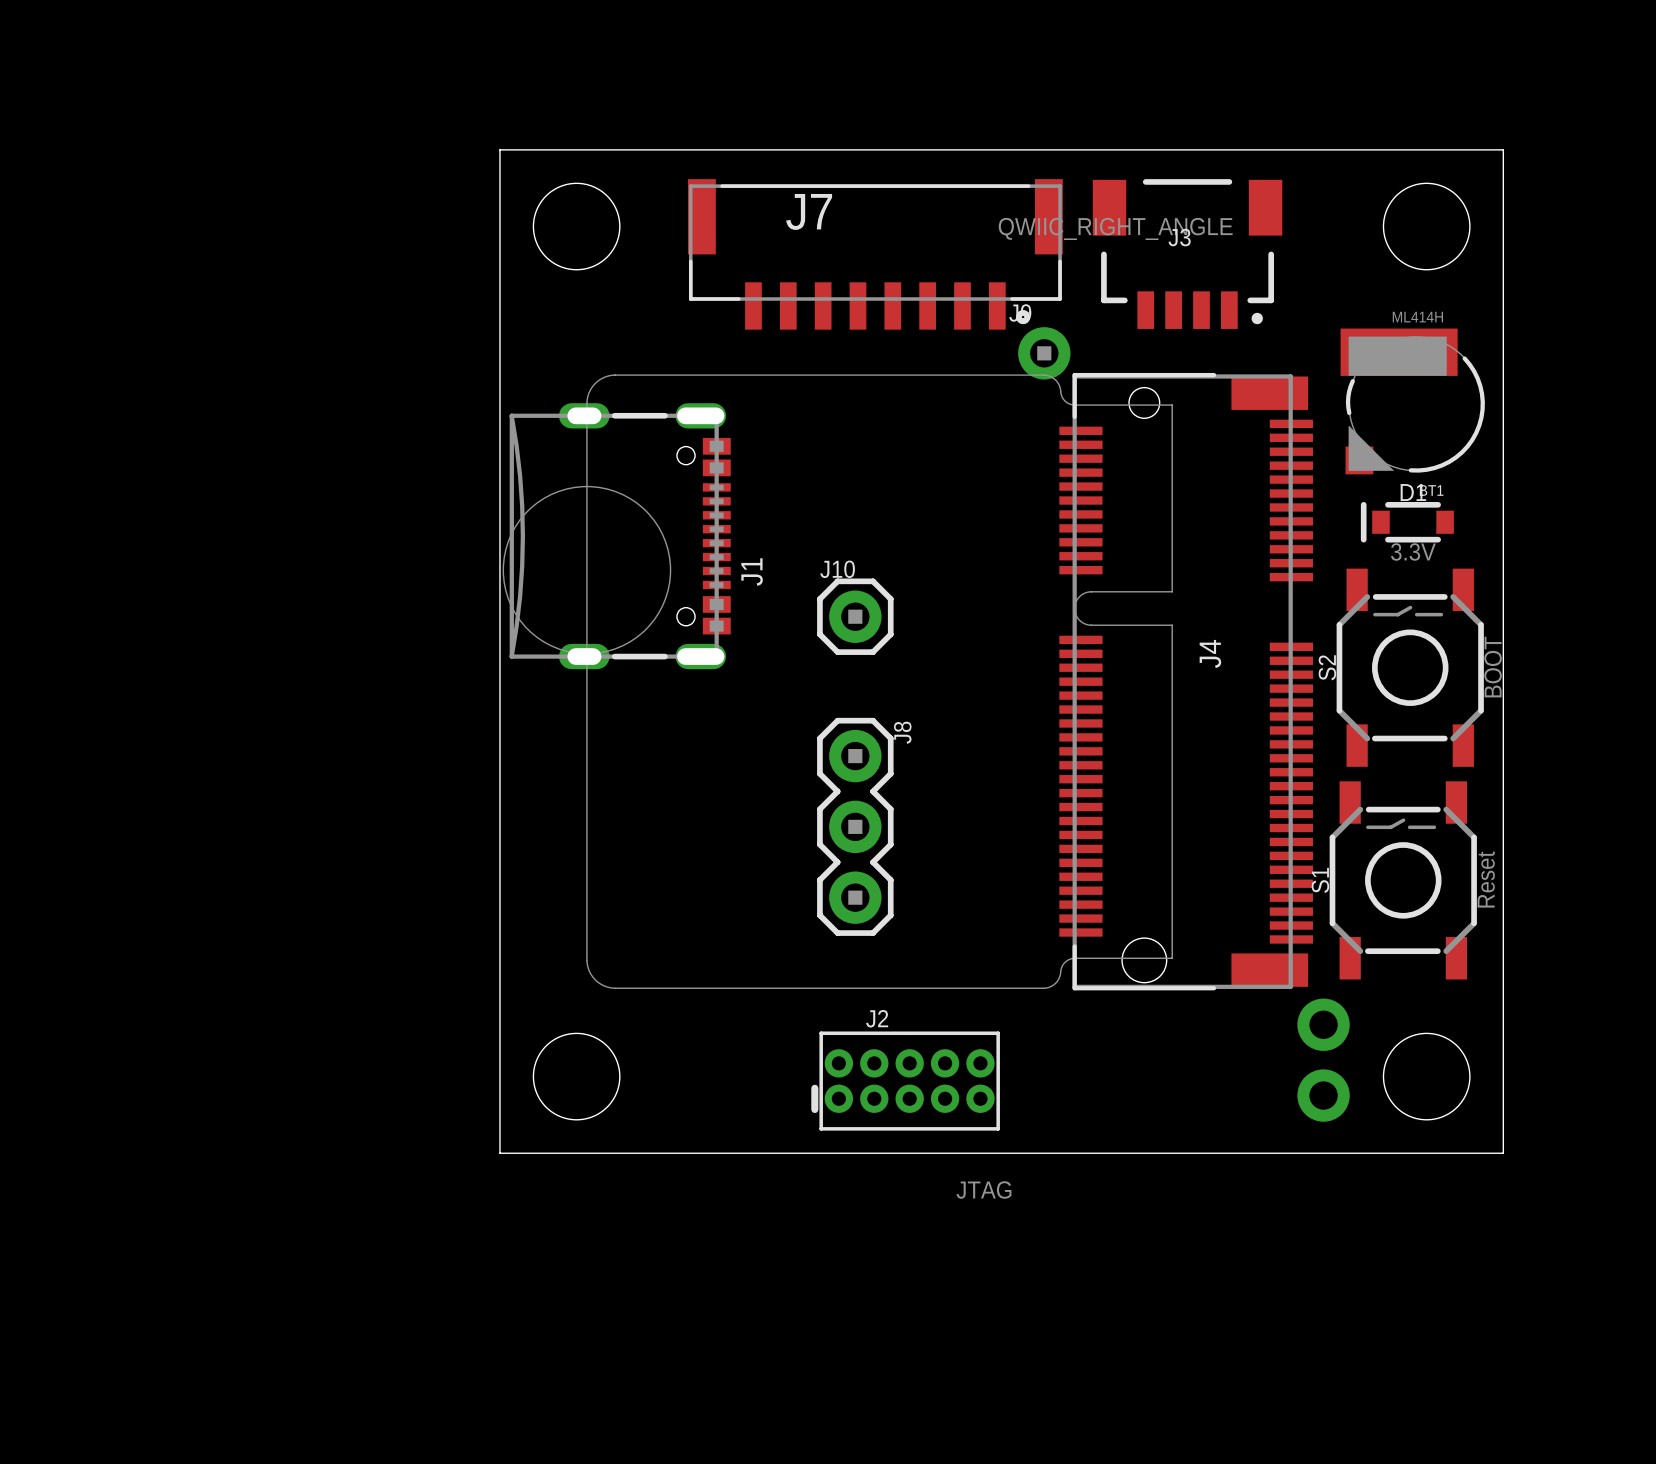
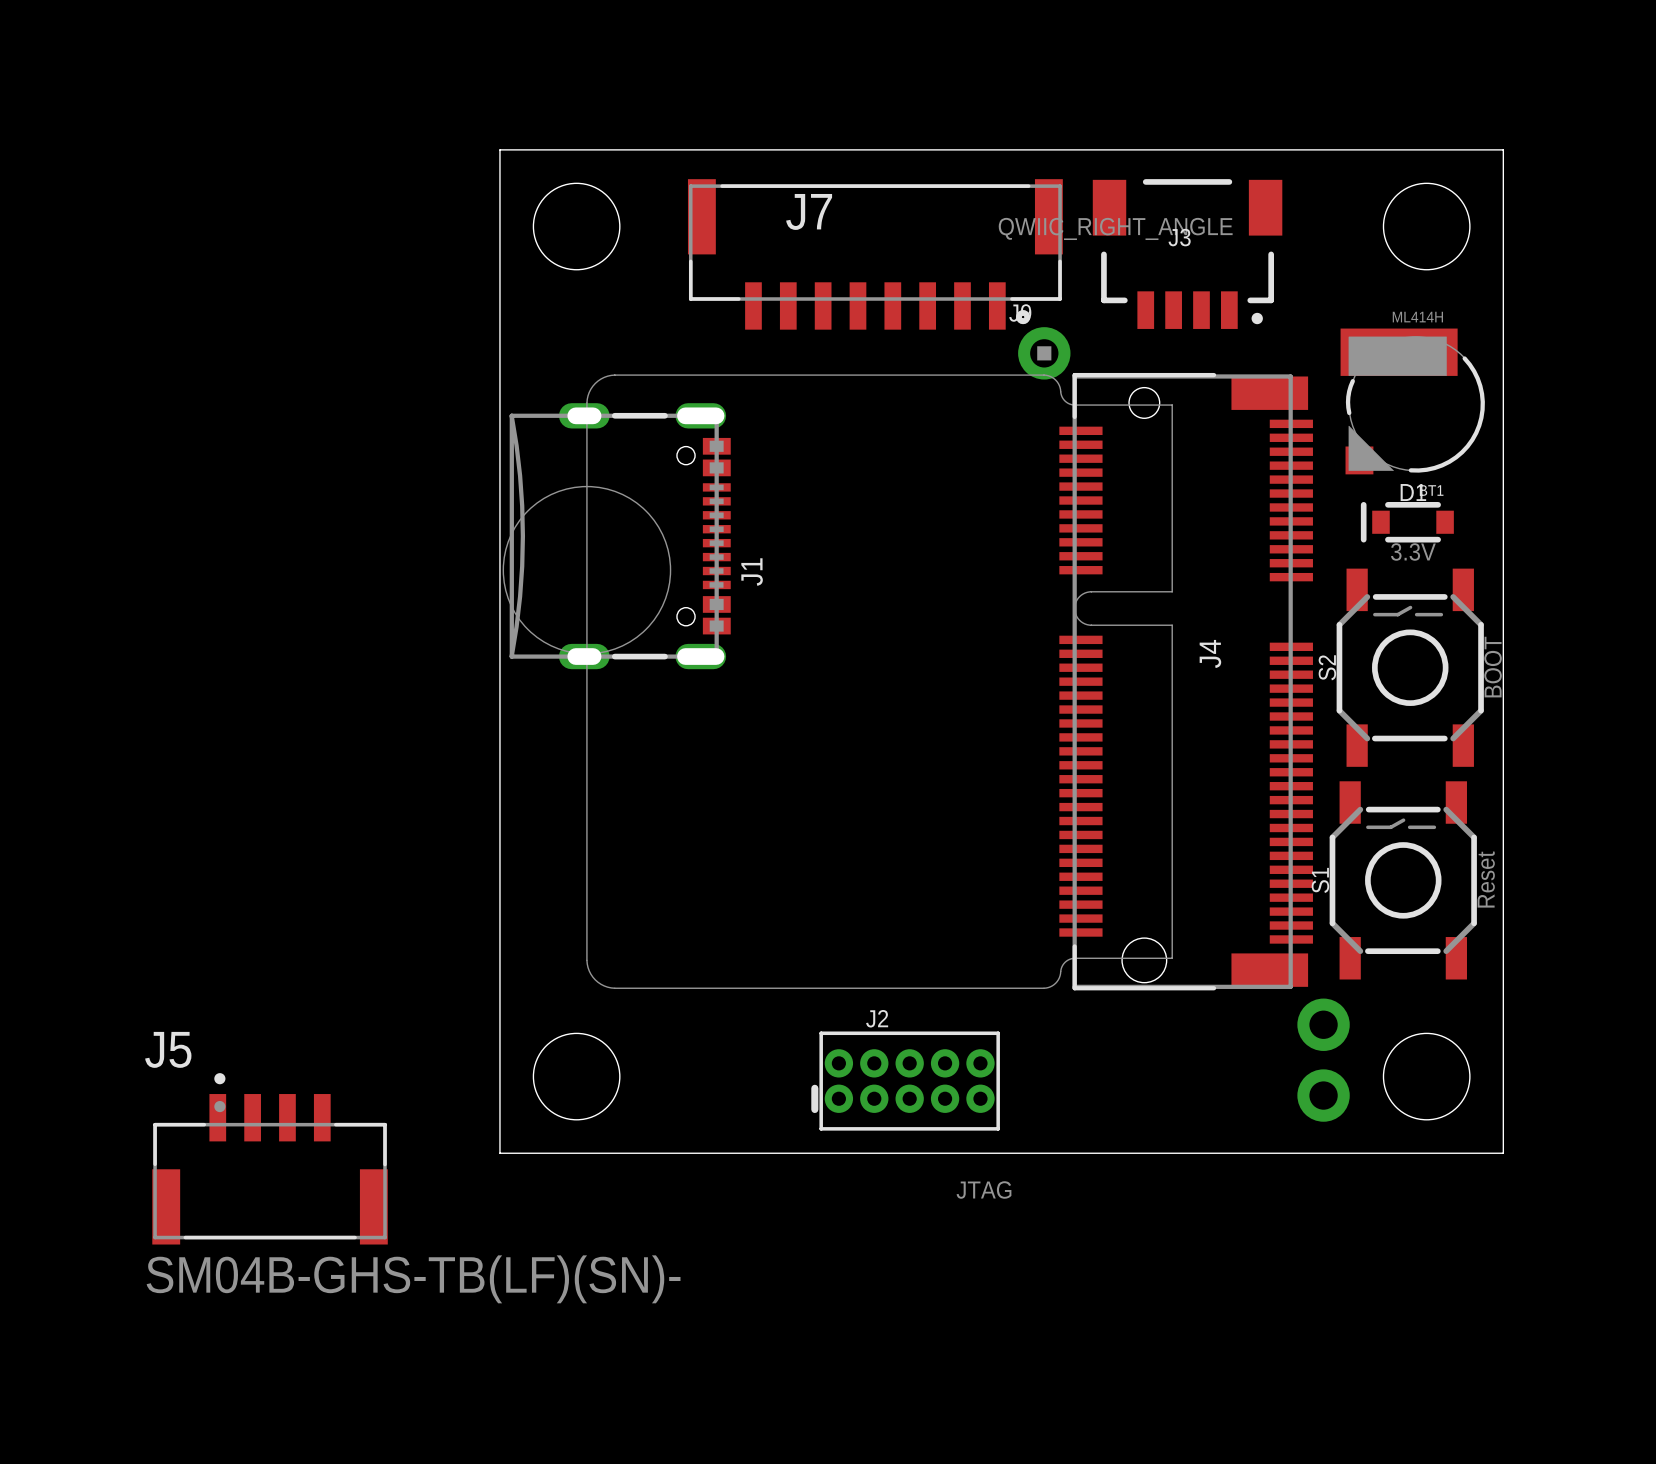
J10: (855, 616) -> none
J8: (855, 826) -> none
J5: none -> SM04B-GHS-TB(LF)(SN)- (270, 1158)

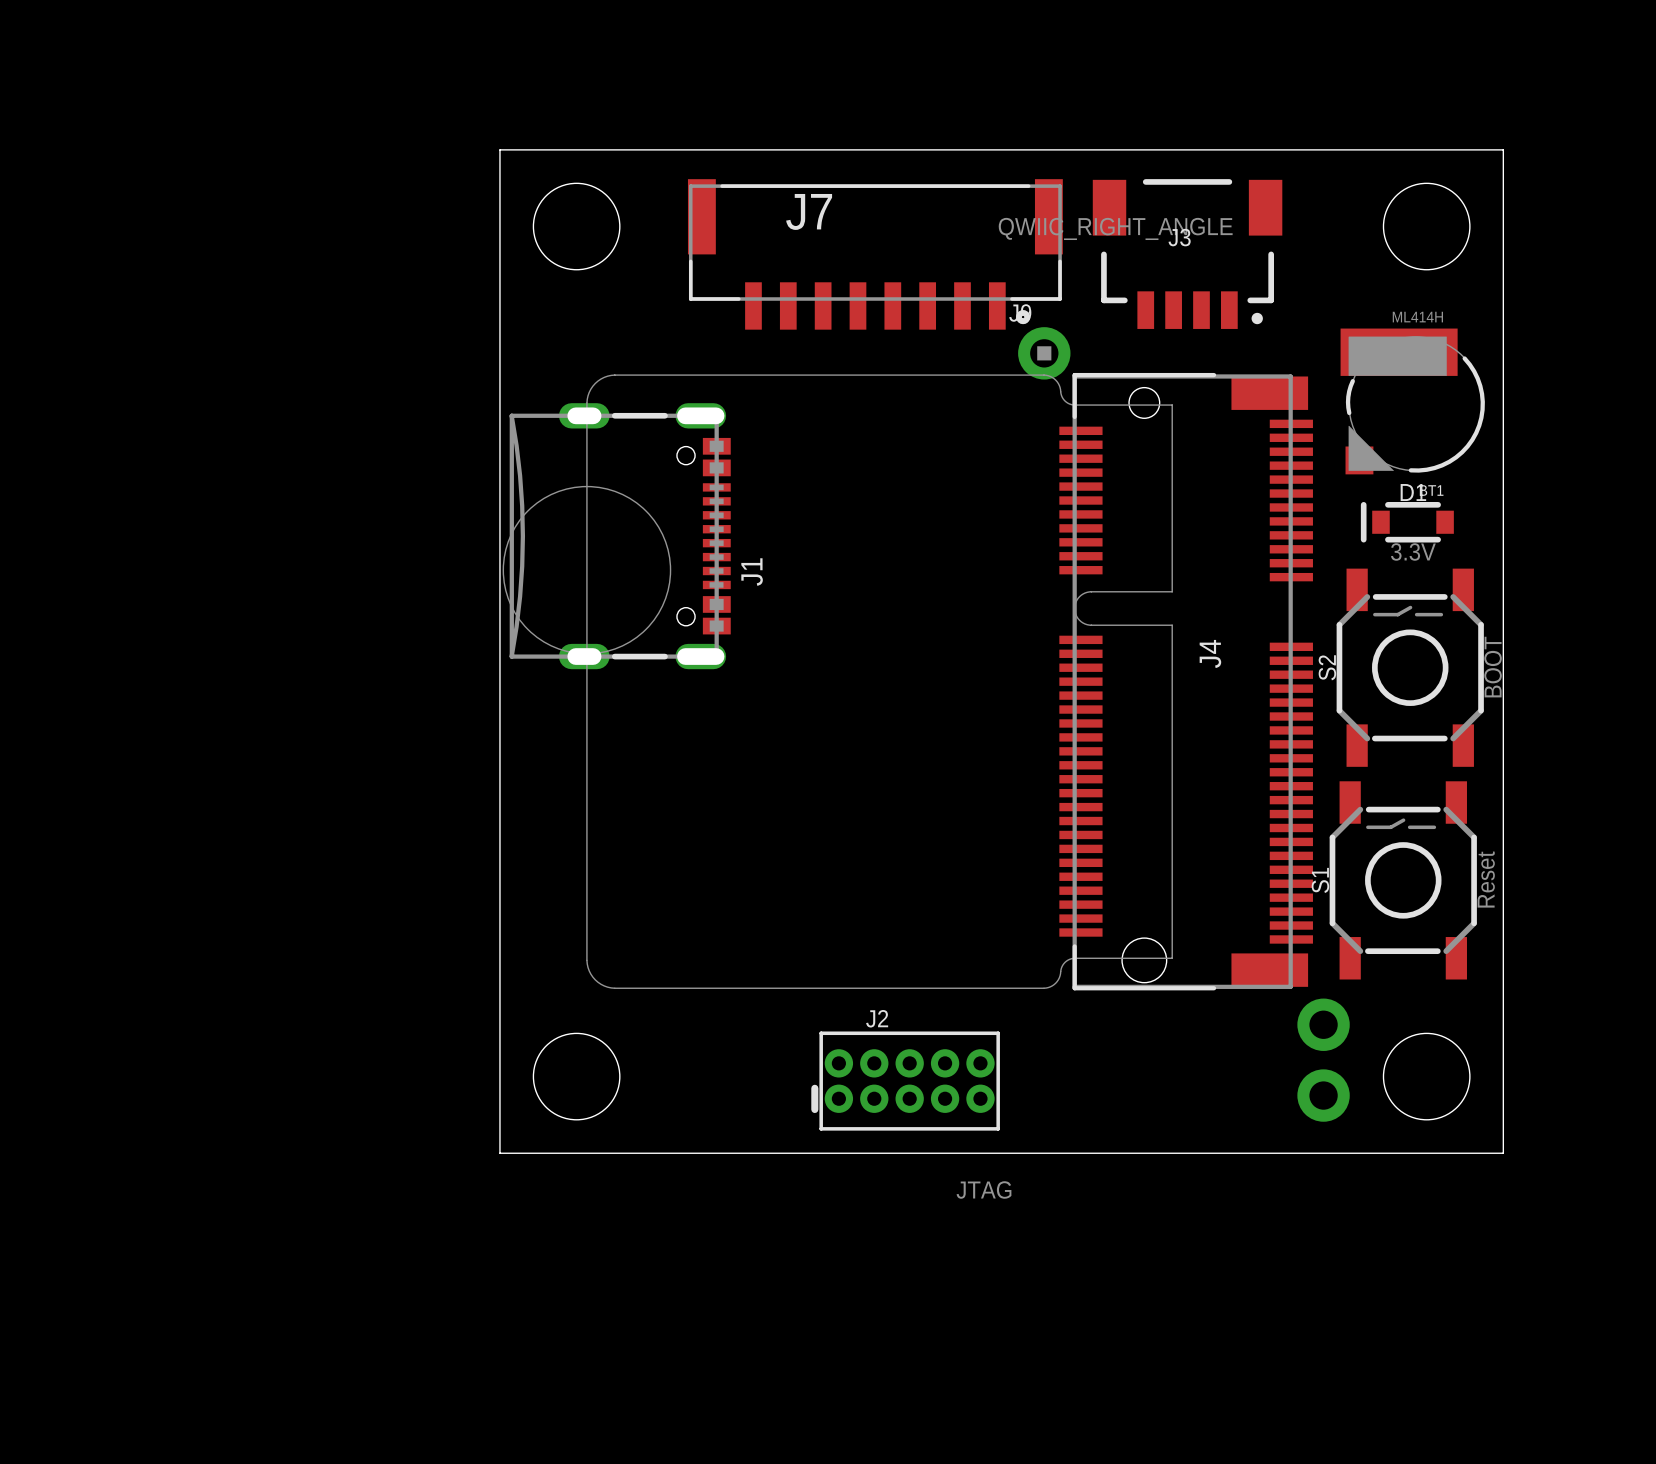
J5: SM04B-GHS-TB(LF)(SN)- (270, 1158) -> none

